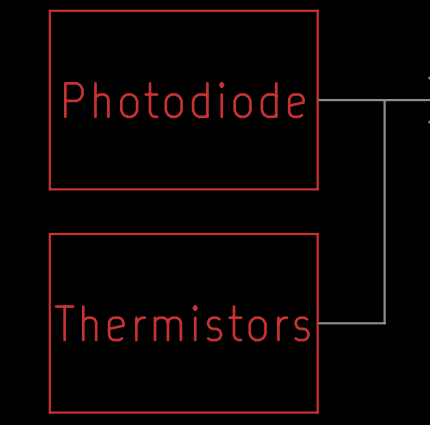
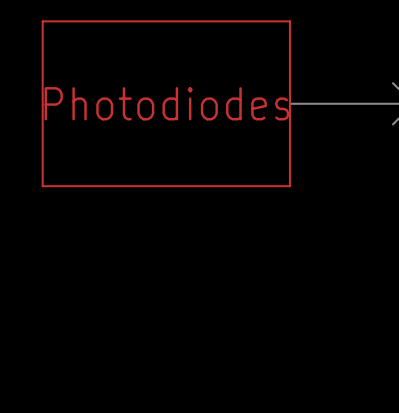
text: Photodiode (184, 100) -> Photodiodes (166, 103)
line: (384, 100) (384, 323) (317, 323) -> none
line: (49, 234) (317, 234) (317, 412) (49, 412) (49, 234) -> none
text: Thermistors (182, 323) -> none

